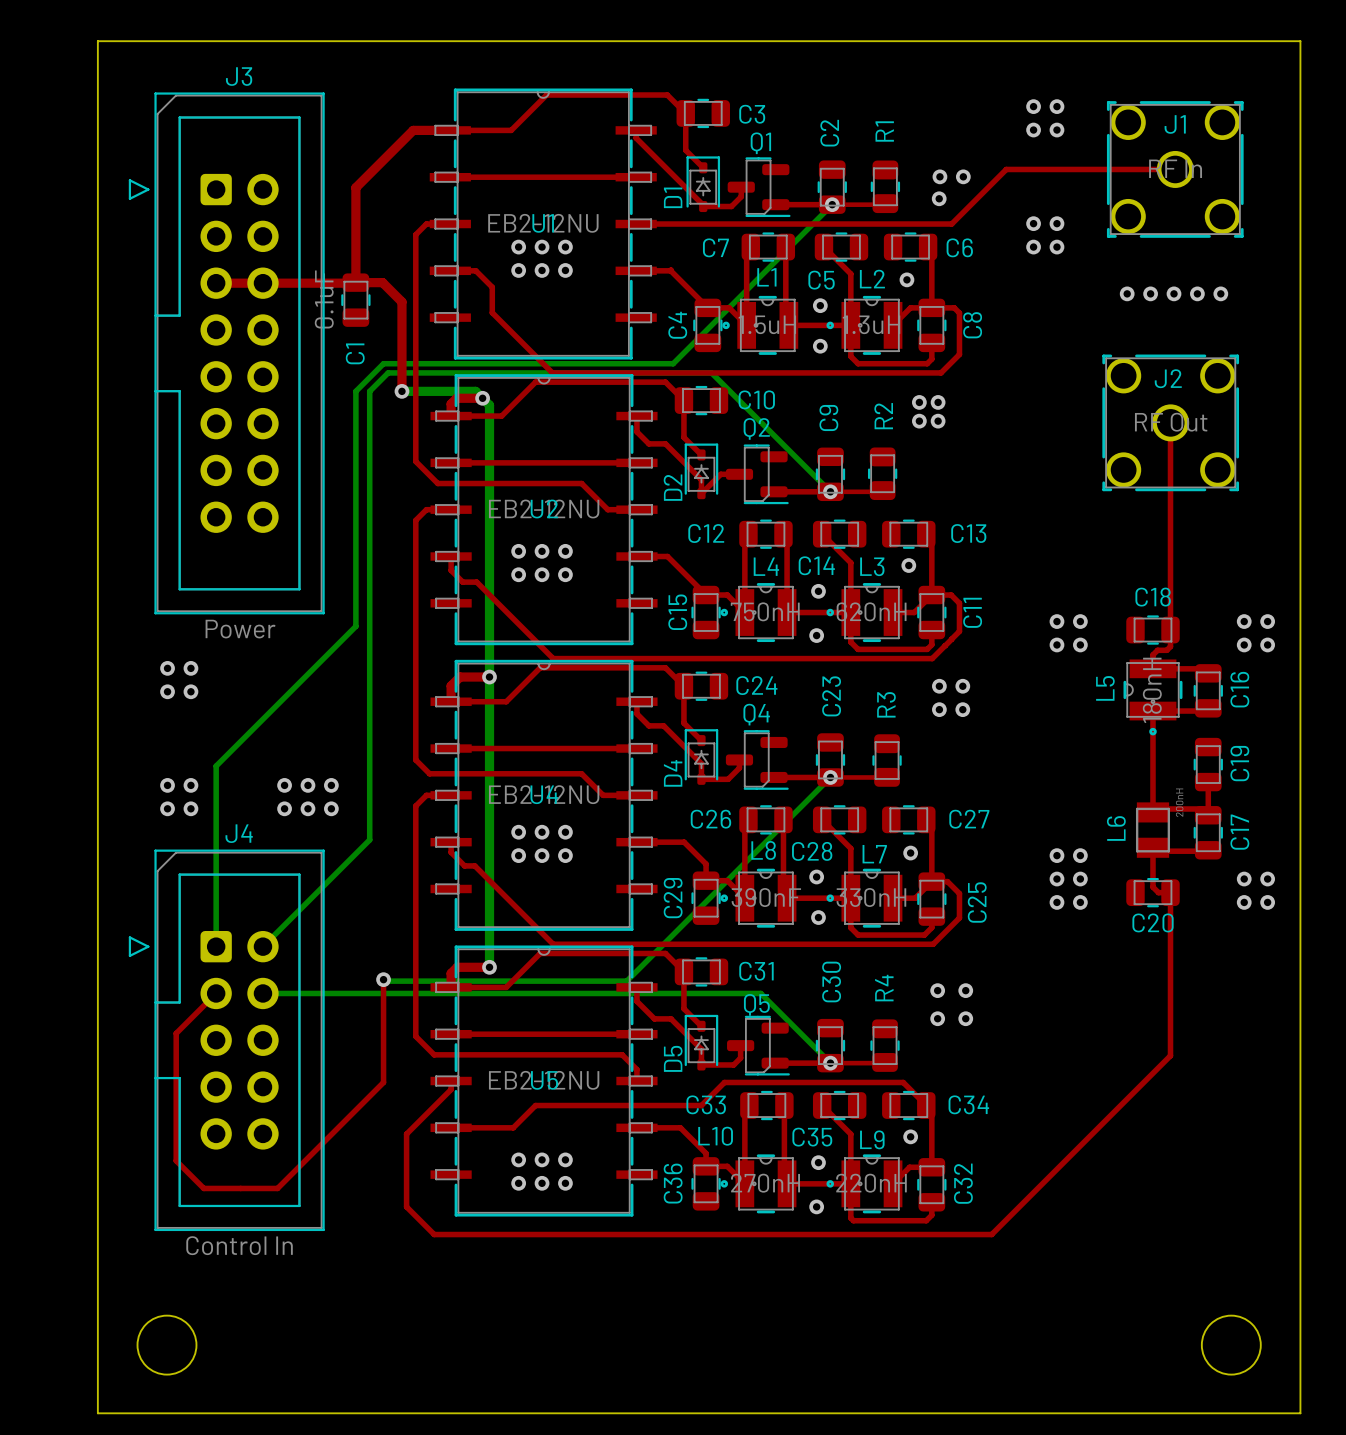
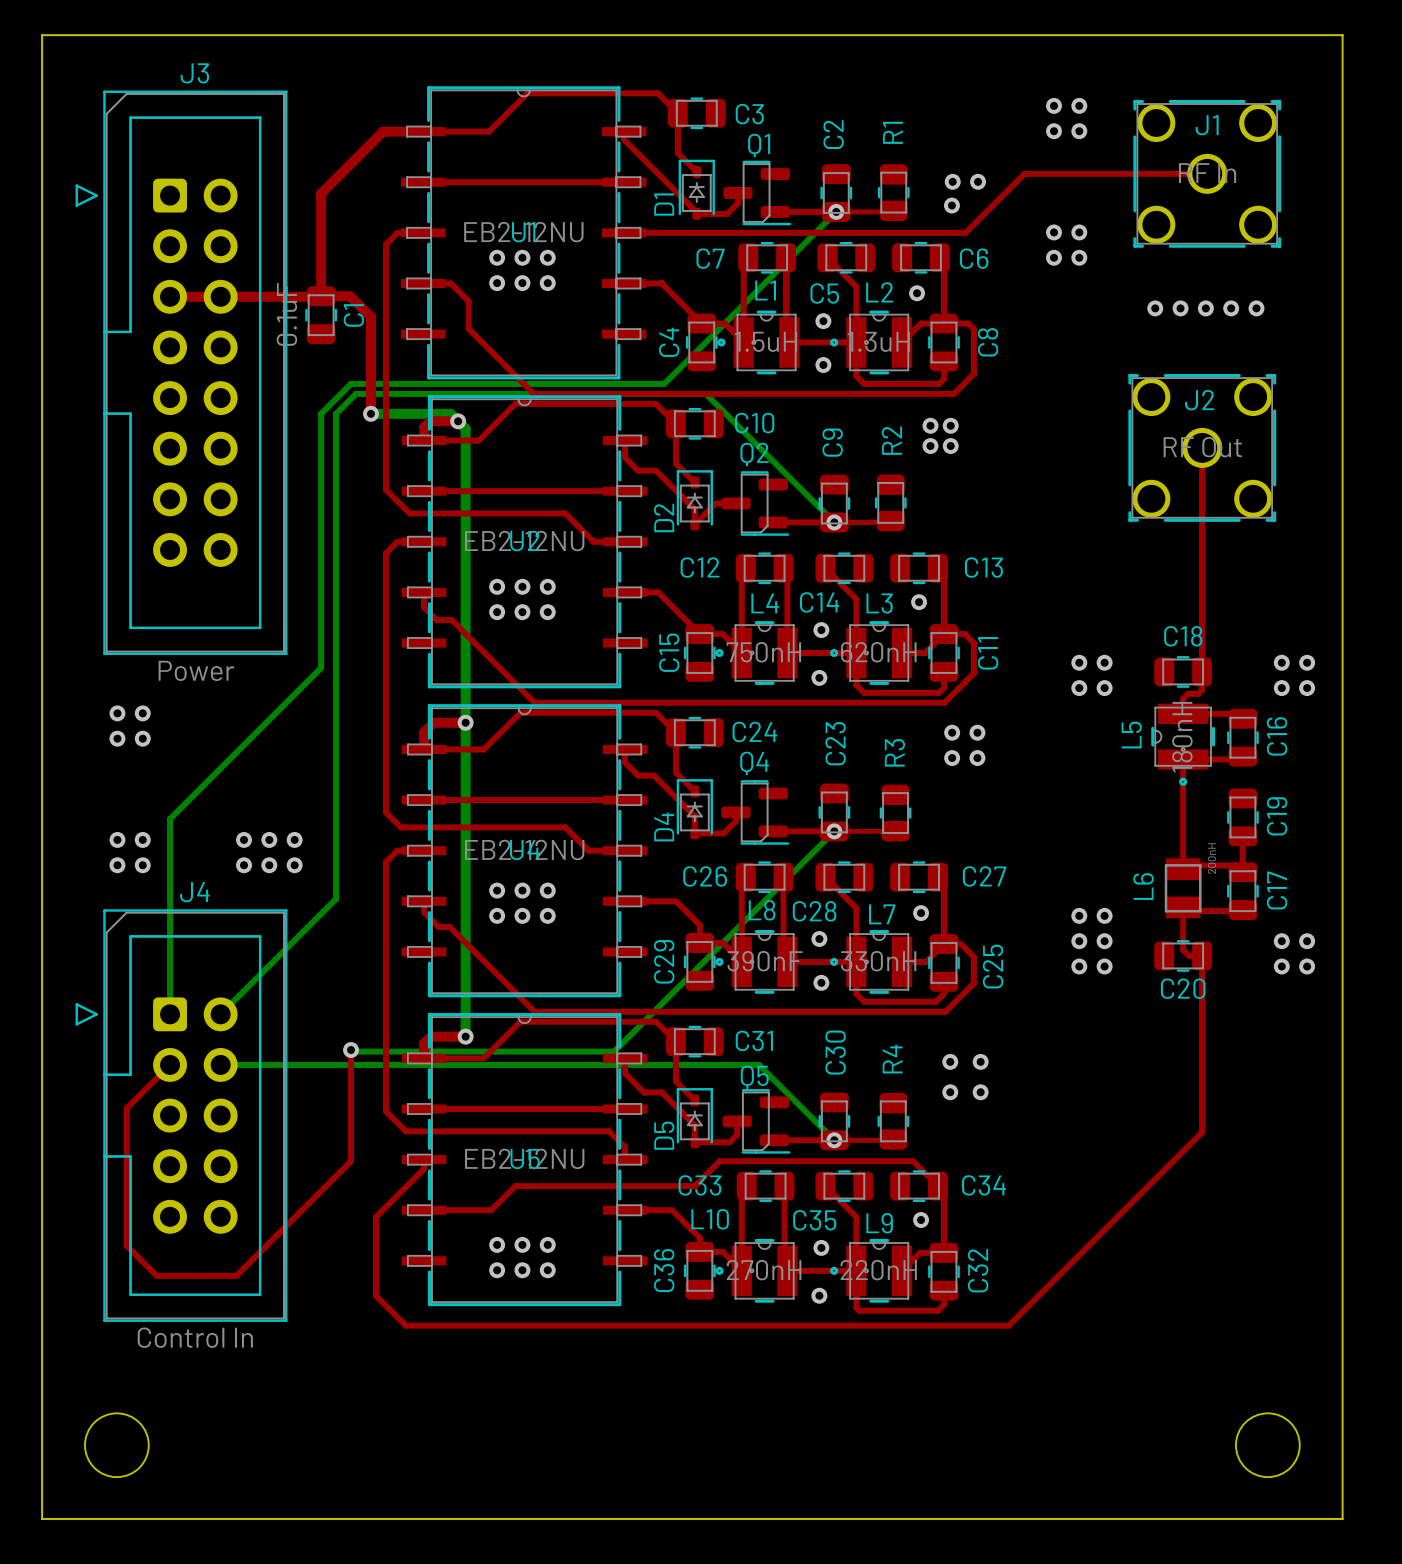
C1 name position: C1 (355, 353) -> C1 (353, 315)

